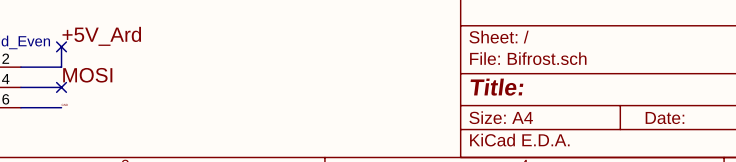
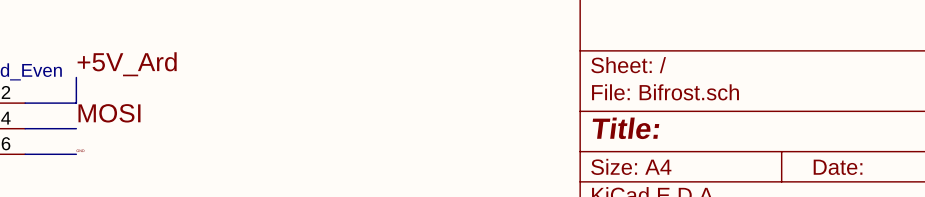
no-connect mark: (61, 46) -> none
no-connect mark: (61, 87) -> none

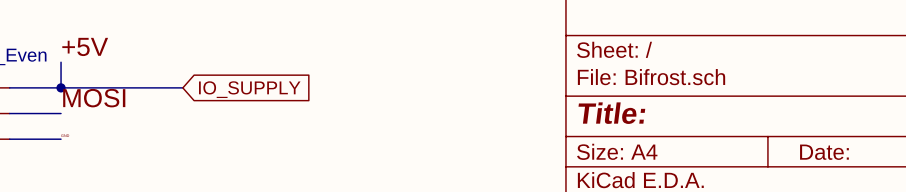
label: +5V_Ard (127, 64) -> +5V (85, 46)
wire: none -> (61, 87) (182, 87)
junction: none -> (61, 87)
global label: none -> IO_SUPPLY (249, 89)

